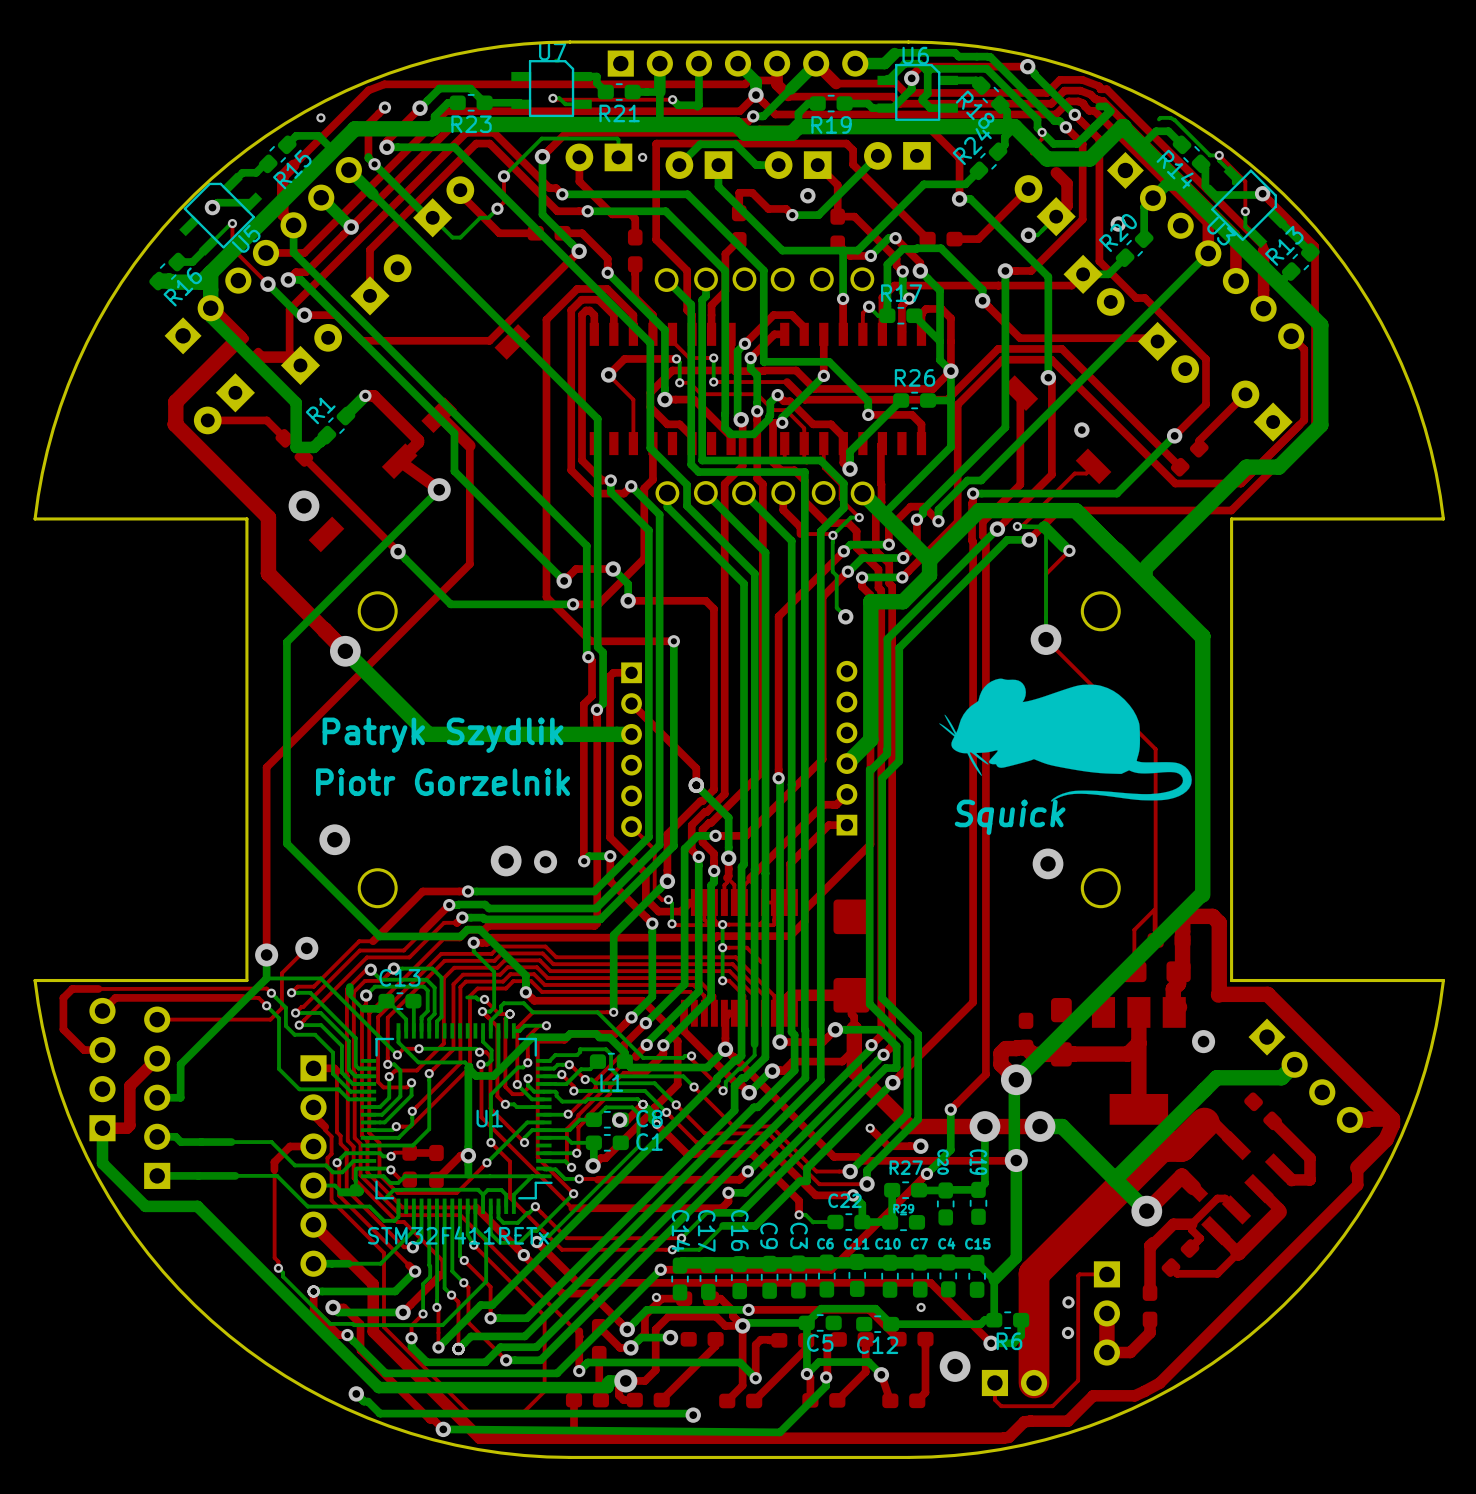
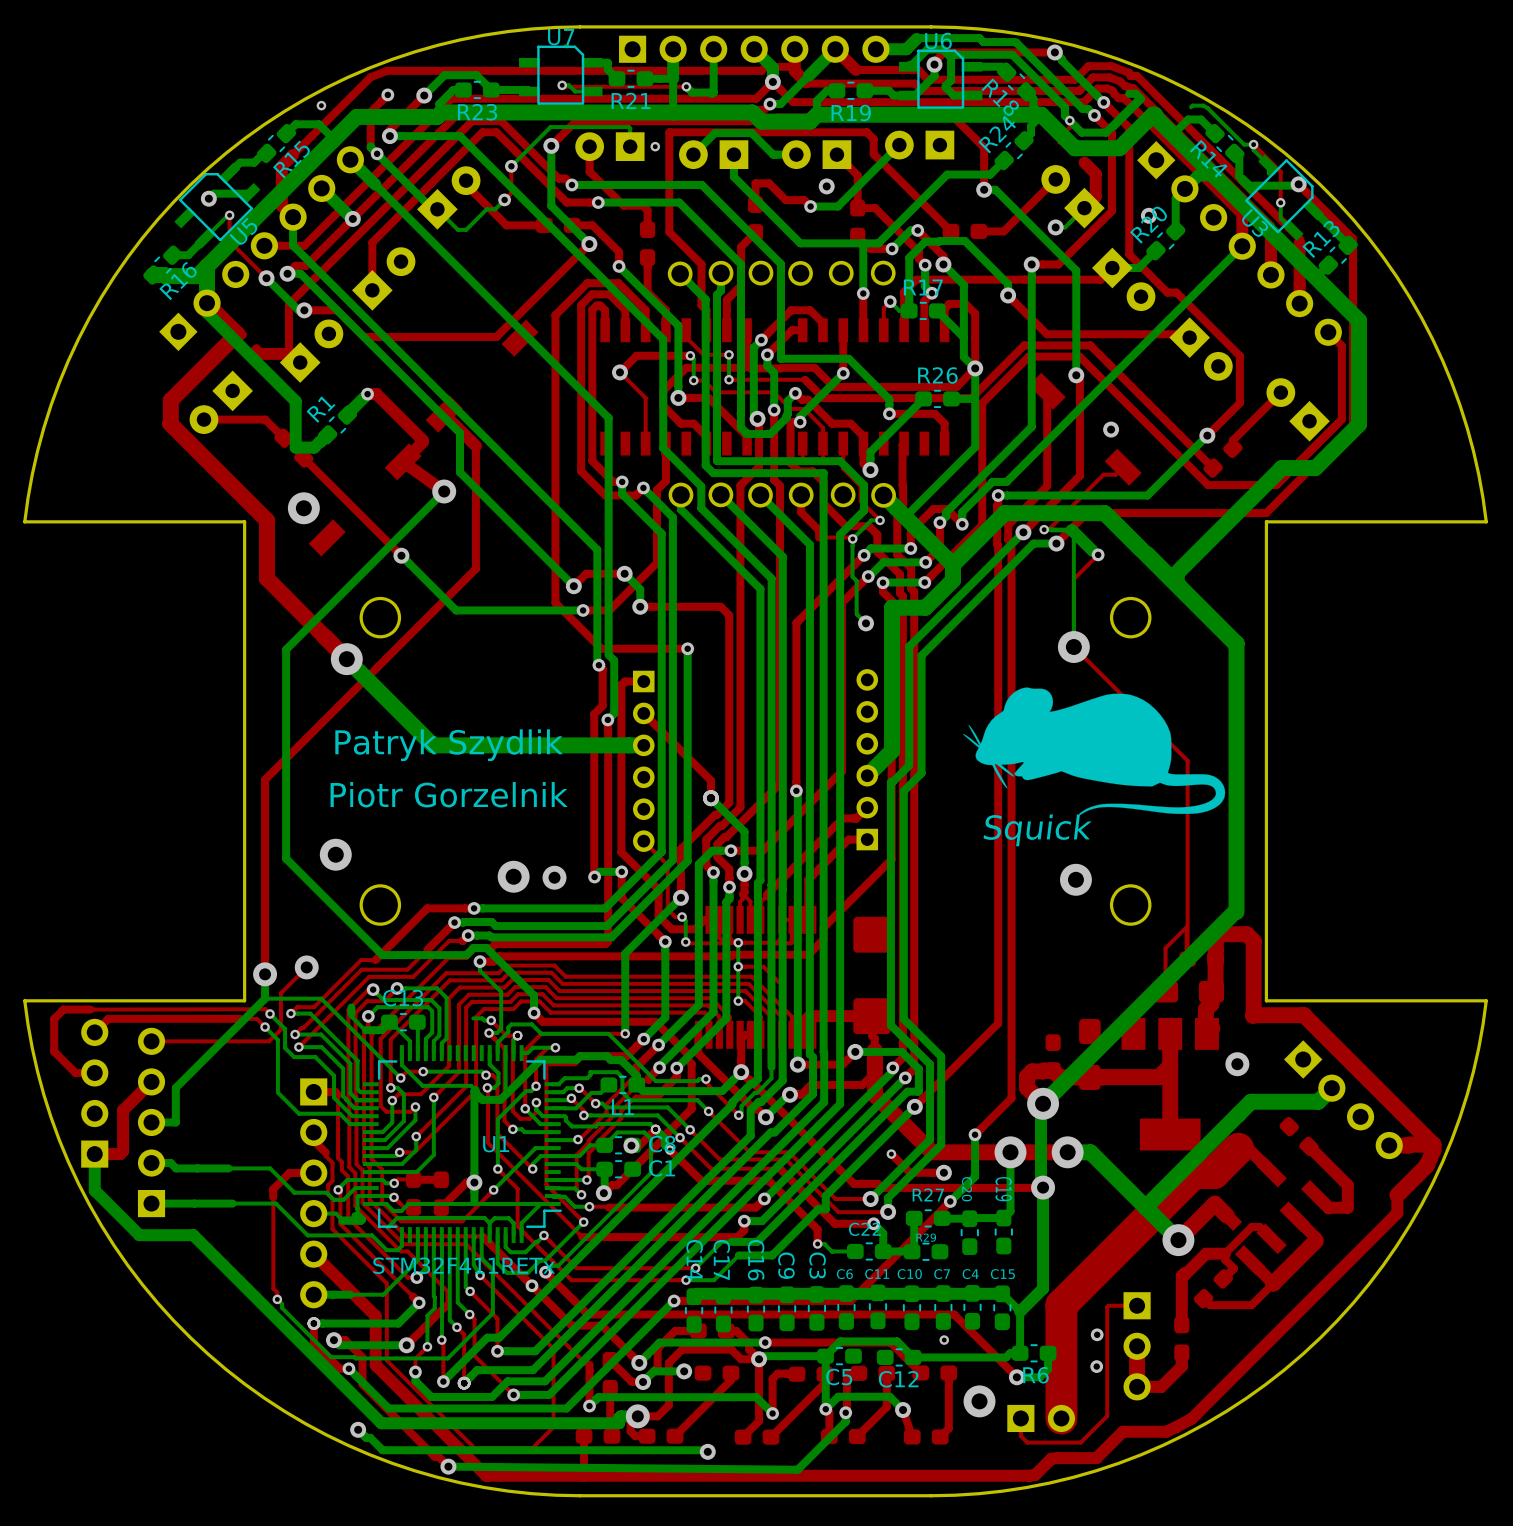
via: (656, 1297) -> none

